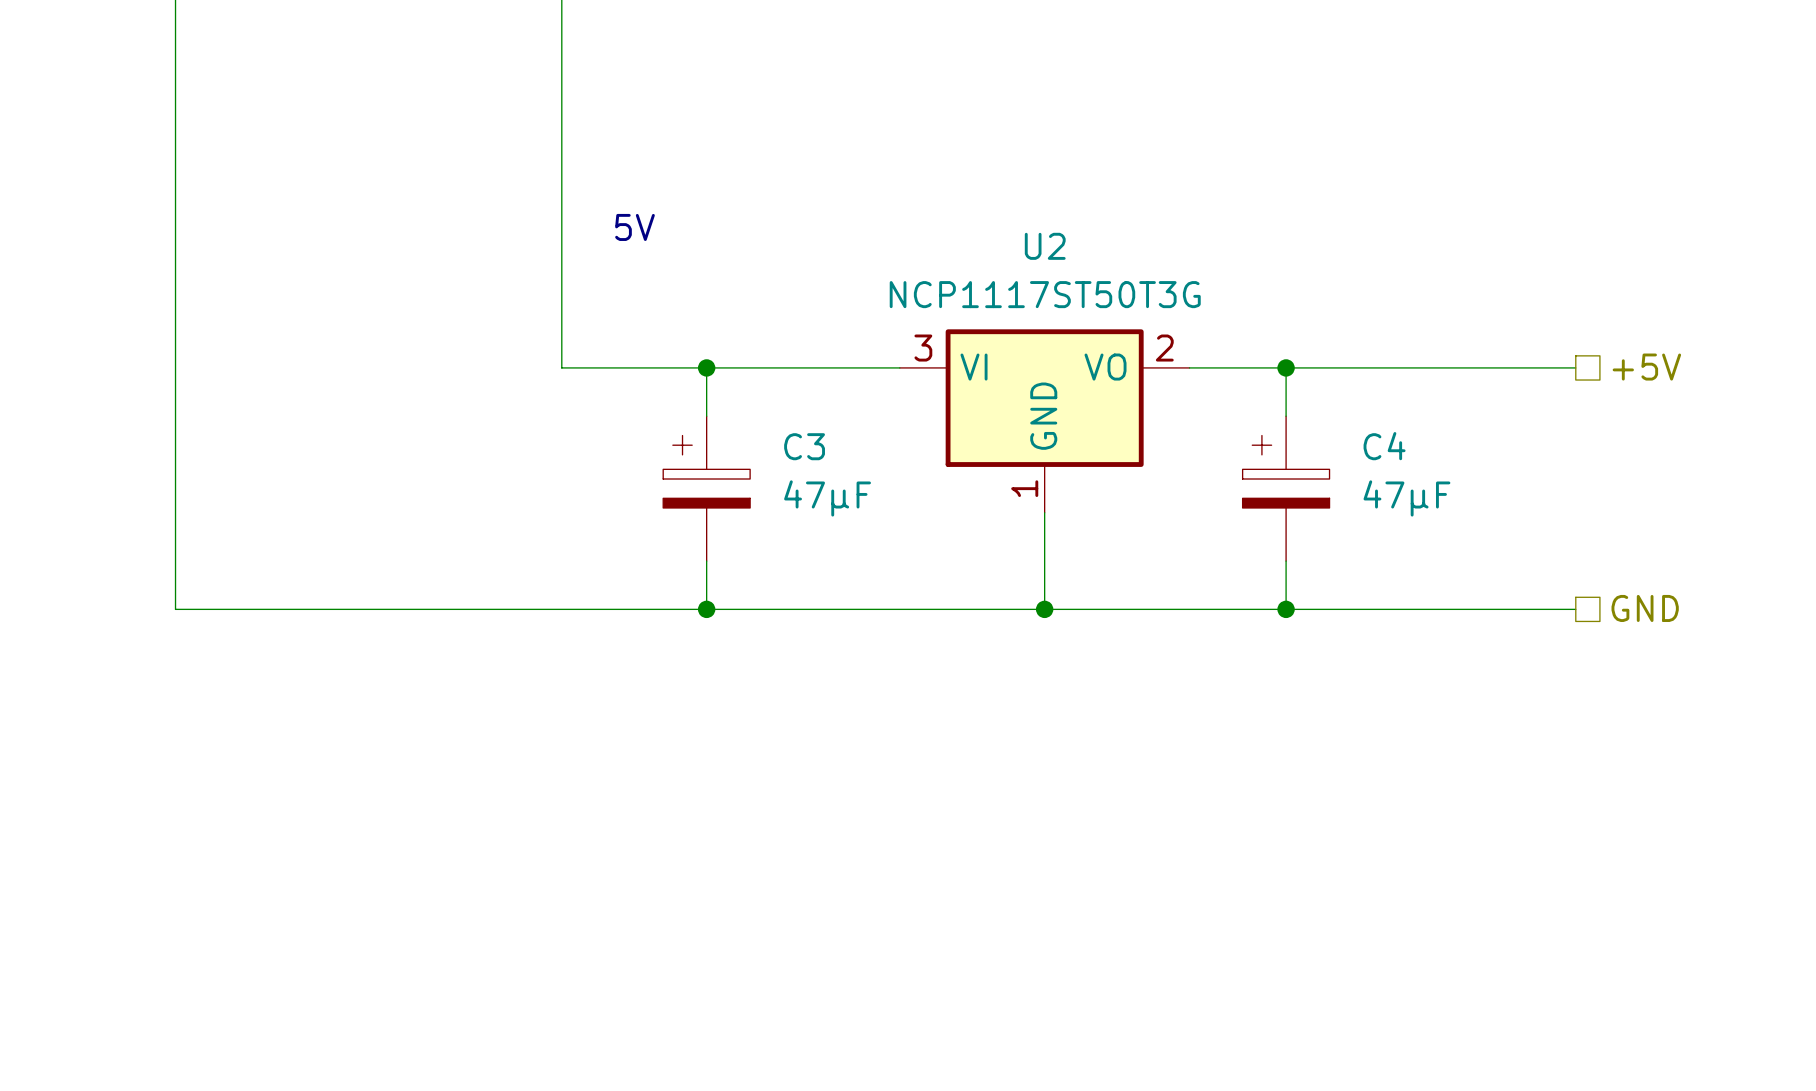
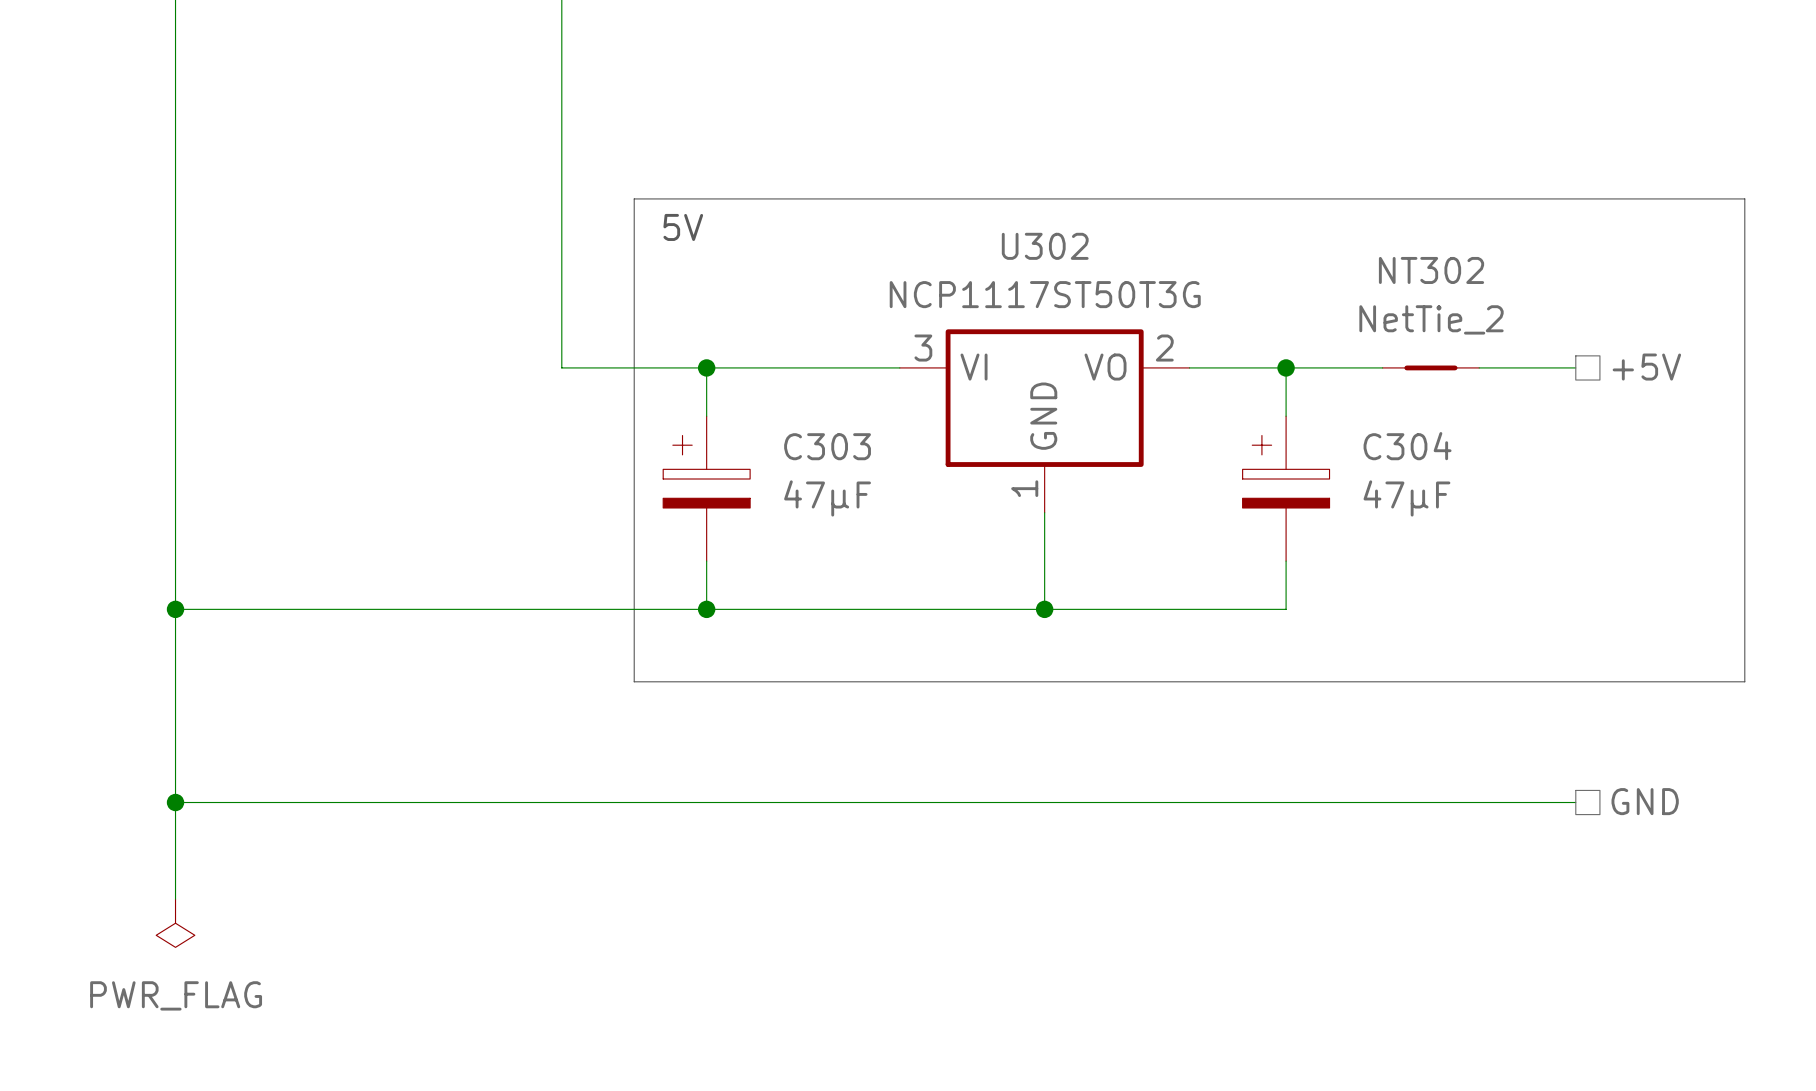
line: none -> (634, 198) (1744, 198) (1744, 681) (634, 681) (634, 198)
text position: 5V (634, 227) -> 5V (683, 227)
U2 name: U2 (1045, 246) -> U302 (1045, 246)
NT302: none -> NetTie_2 (1430, 367)
C3 name: C3 (804, 446) -> C303 (827, 446)
C4 name: C4 (1384, 446) -> C304 (1407, 446)
hierarchical label position: GND (1645, 608) -> GND (1645, 801)
wire: none -> (175, 609) (175, 899)
junction: none -> (175, 609)
wire: (1286, 609) (1575, 609) -> none
junction: (1286, 609) -> none
wire: none -> (175, 802) (1575, 802)
junction: none -> (175, 802)
power symbol: none -> PWR_FLAG (175, 923)

